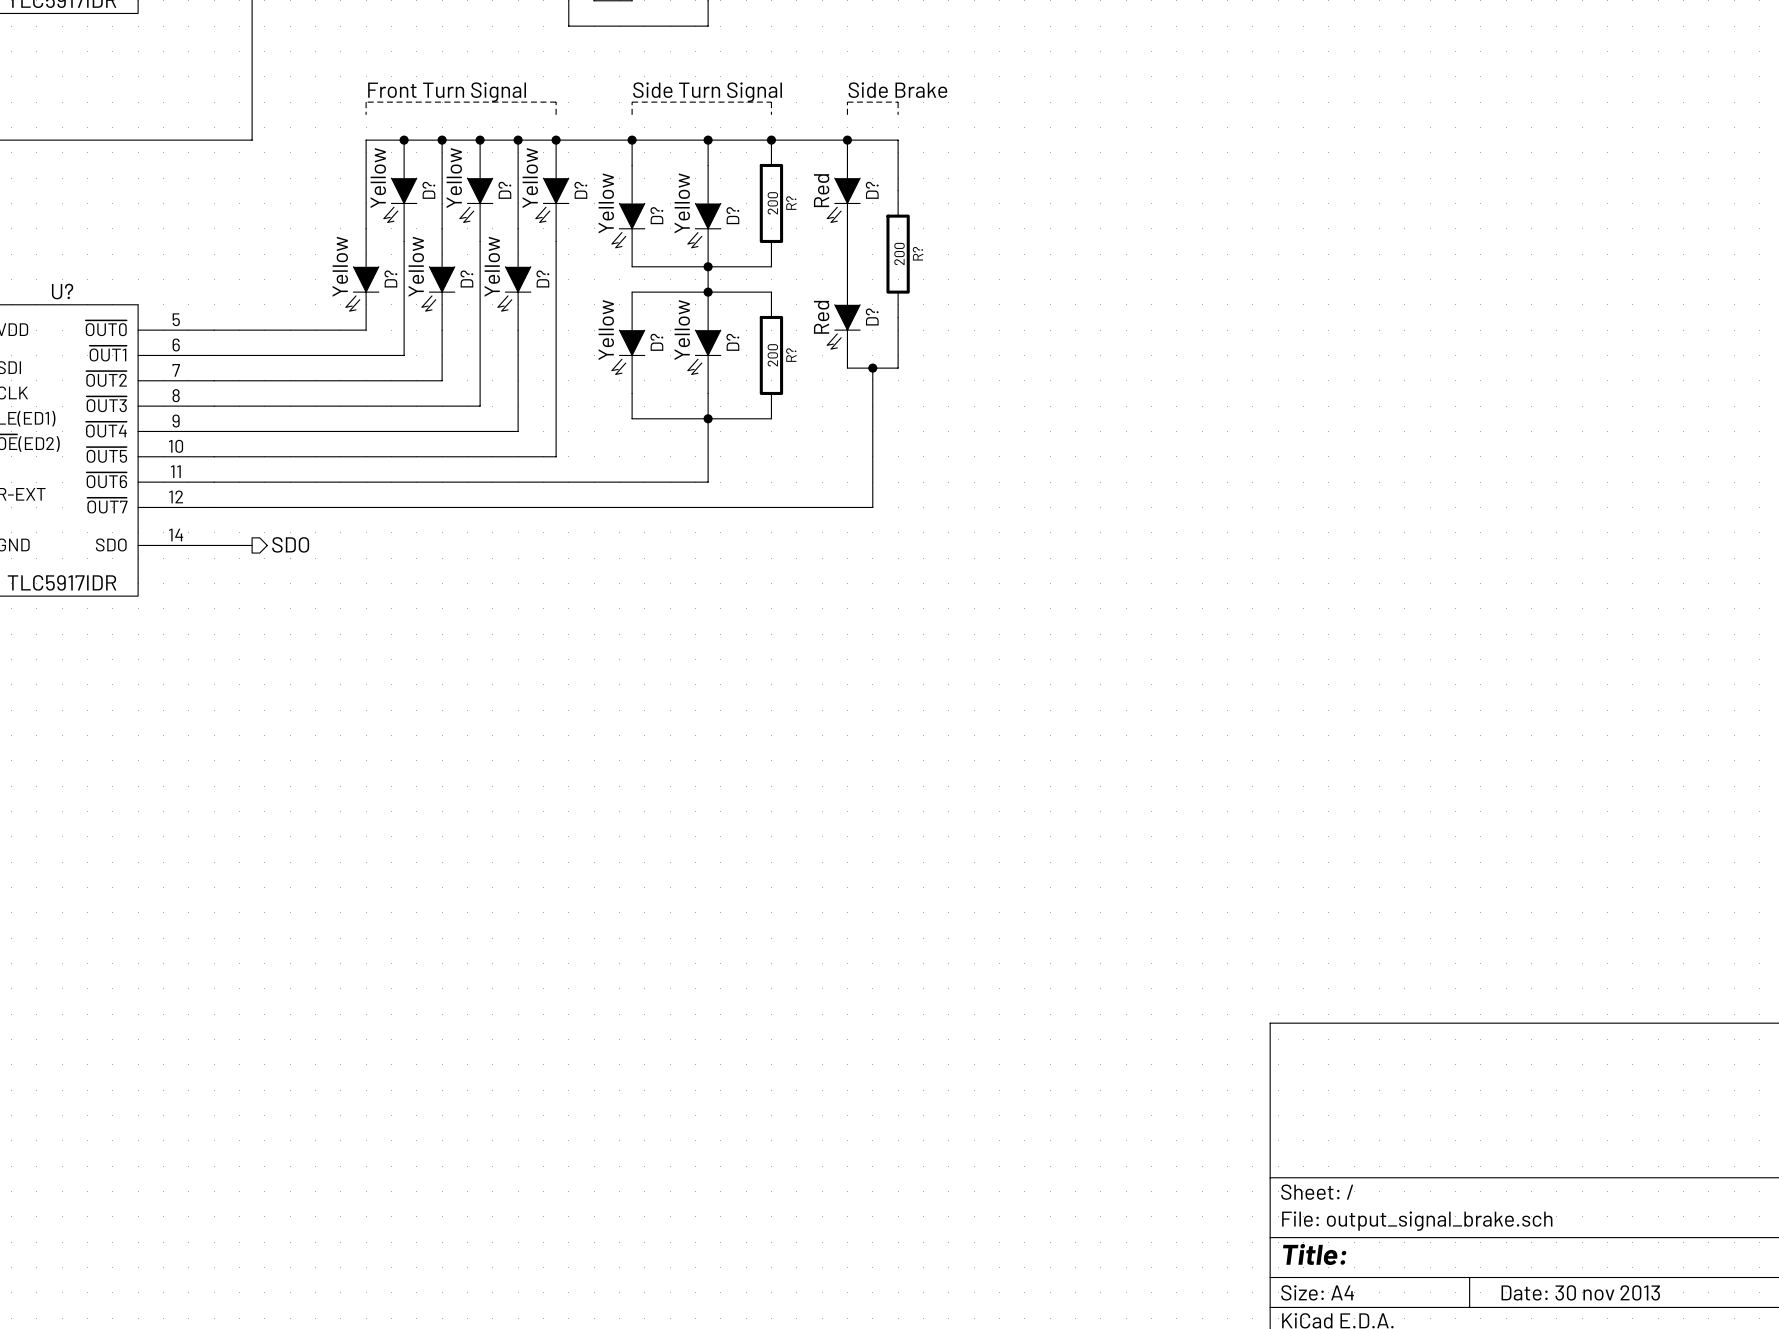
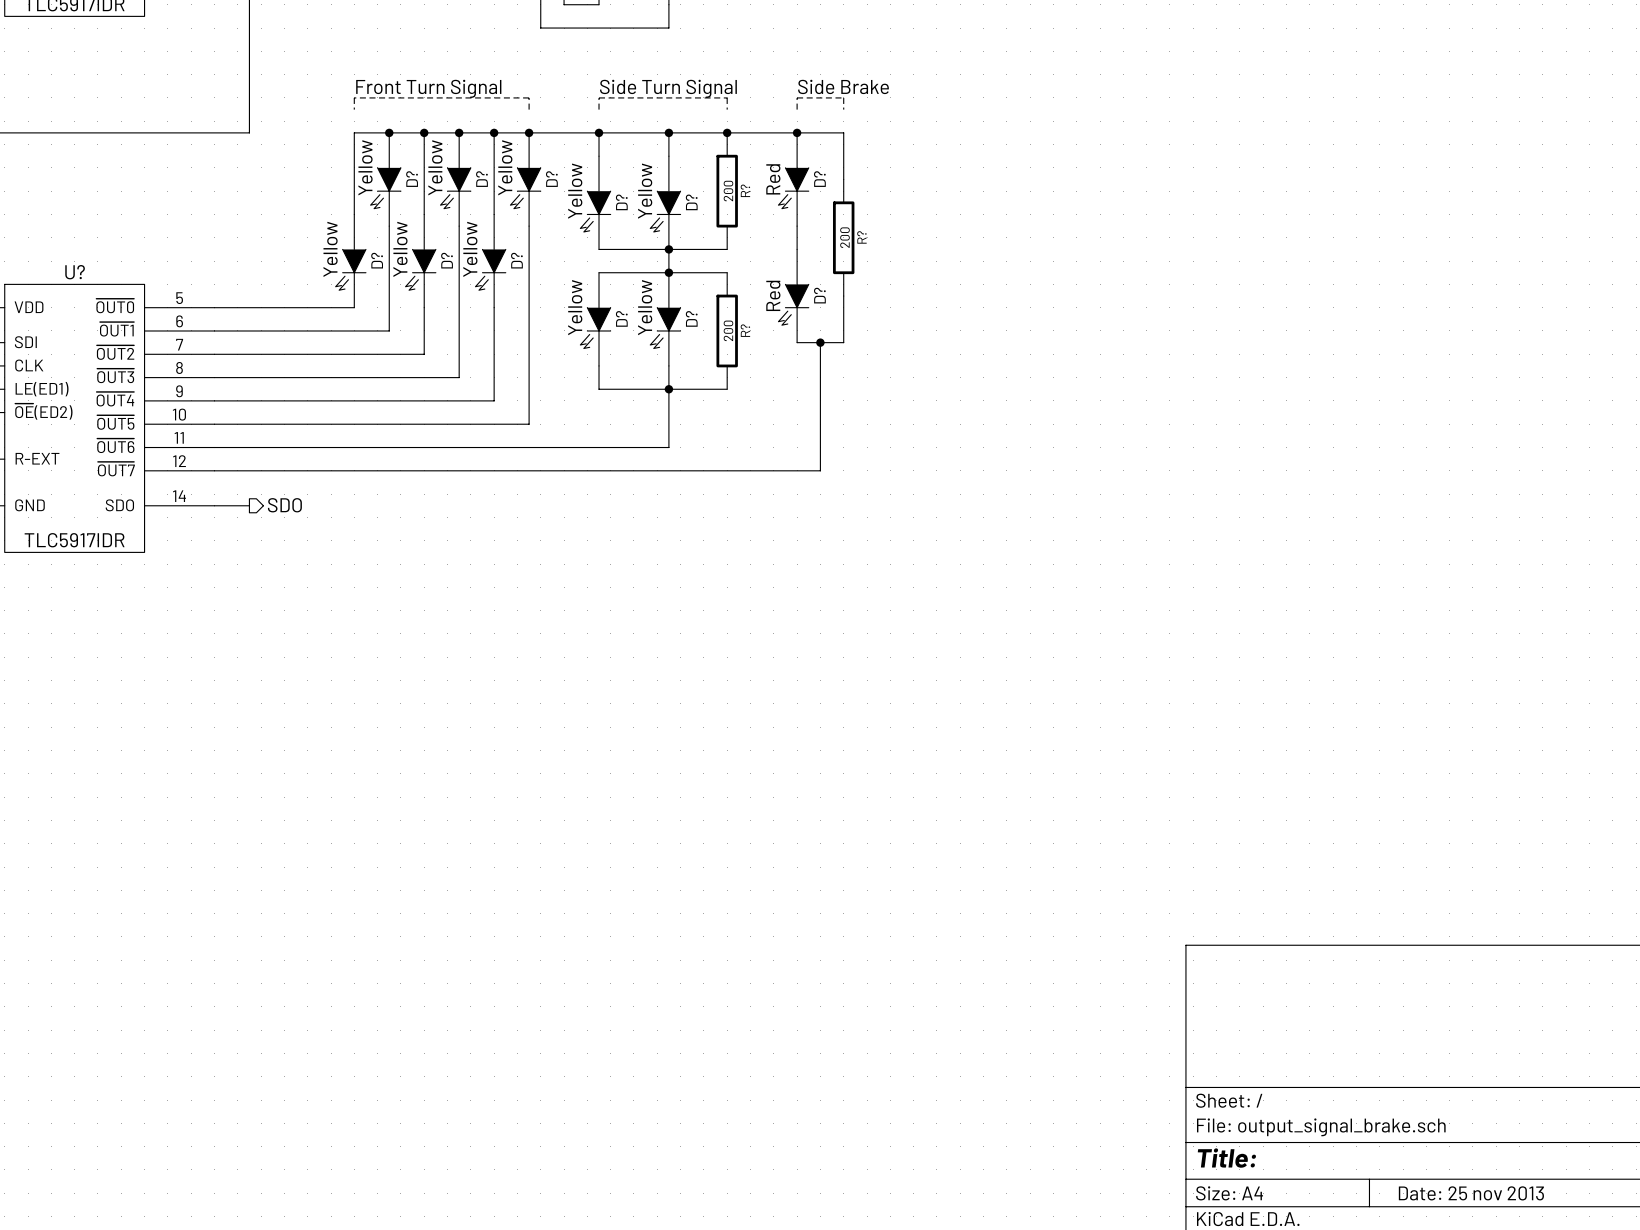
title block: Date: 30 nov 2013 (1580, 1292) -> Date: 25 nov 2013 (1471, 1193)

